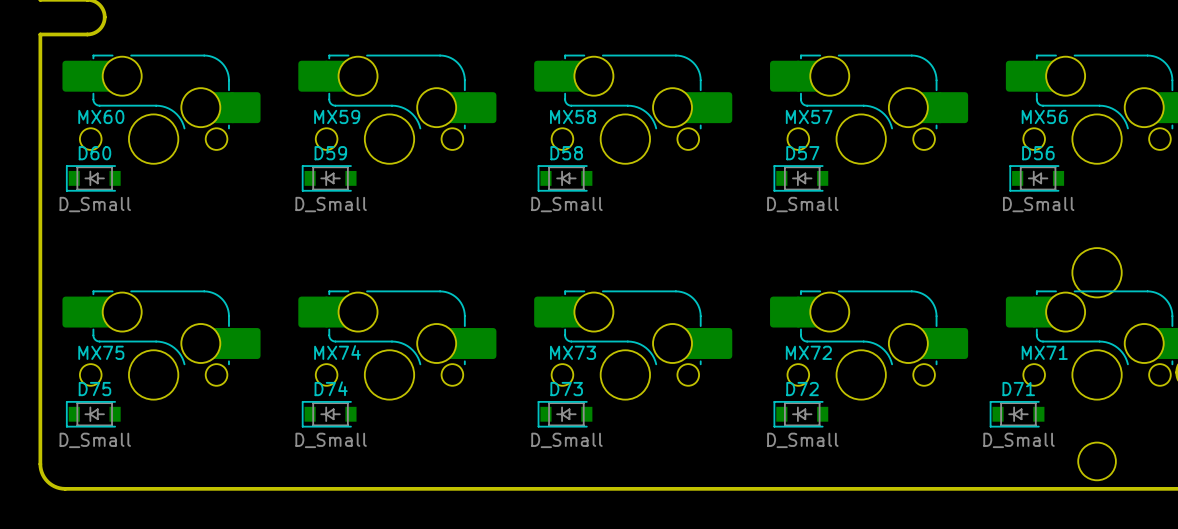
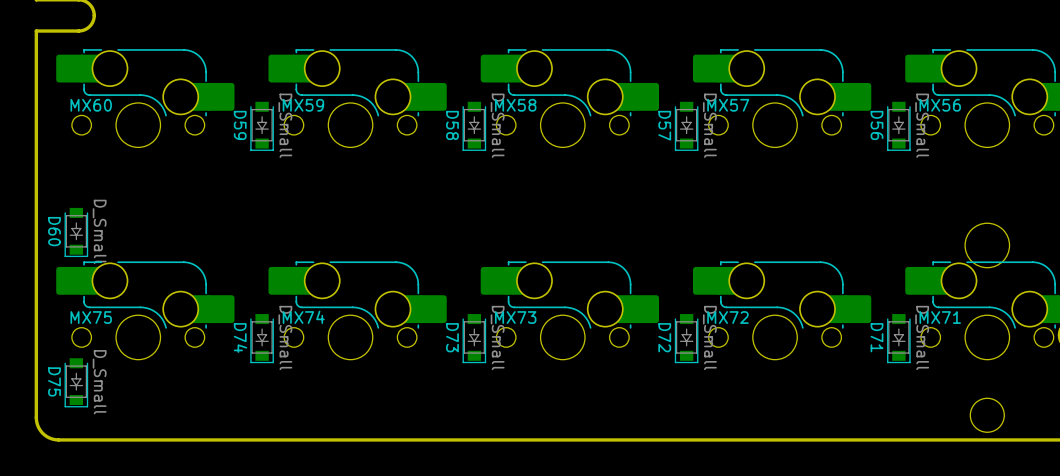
D60 rotation: 0° (93, 178) -> 90° counterclockwise (76, 232)
D60 position: (93, 178) -> (76, 232)
D59 rotation: 0° (329, 178) -> 90° counterclockwise (262, 126)
D59 position: (329, 178) -> (262, 126)
D58 rotation: 0° (565, 178) -> 90° counterclockwise (474, 126)
D58 position: (565, 178) -> (474, 126)
D57 rotation: 0° (800, 178) -> 90° counterclockwise (686, 126)
D57 position: (800, 178) -> (686, 126)
D56 rotation: 0° (1036, 178) -> 90° counterclockwise (898, 126)
D56 position: (1036, 178) -> (898, 126)
D75 rotation: 0° (93, 414) -> 90° counterclockwise (76, 382)
D74 rotation: 0° (329, 414) -> 90° counterclockwise (262, 338)
D74 position: (329, 414) -> (262, 338)
D73 rotation: 0° (565, 414) -> 90° counterclockwise (474, 338)
D73 position: (565, 414) -> (474, 338)
D72 rotation: 0° (800, 414) -> 90° counterclockwise (686, 338)
D72 position: (800, 414) -> (686, 338)
D71 rotation: 0° (1017, 414) -> 90° counterclockwise (898, 338)
D71 position: (1017, 414) -> (898, 338)

